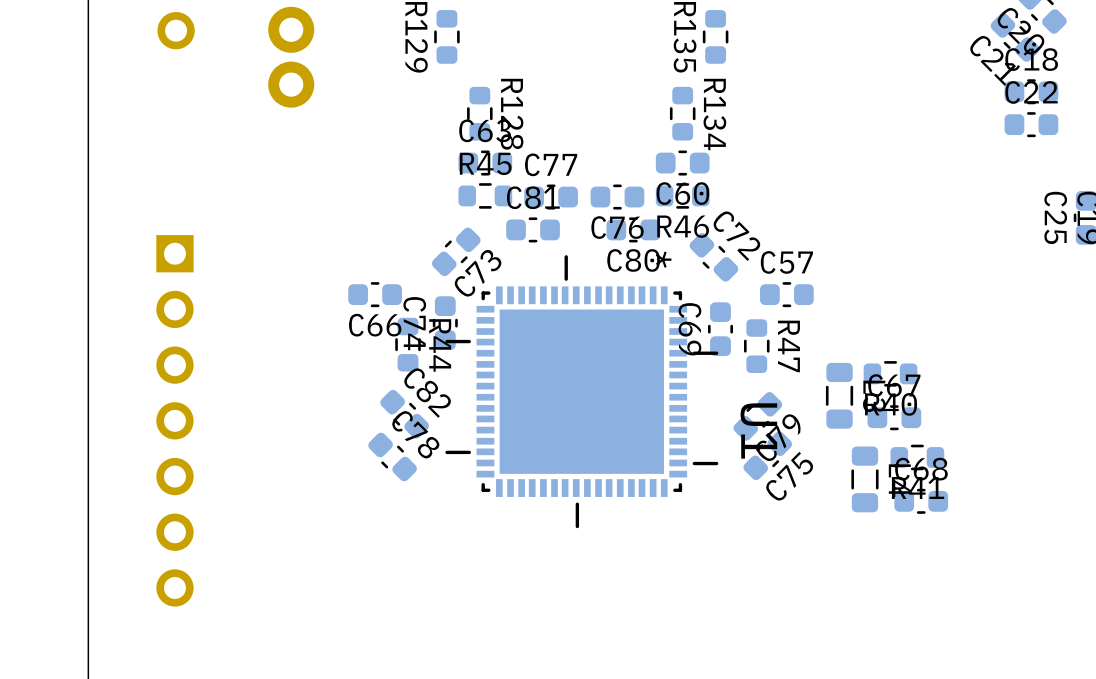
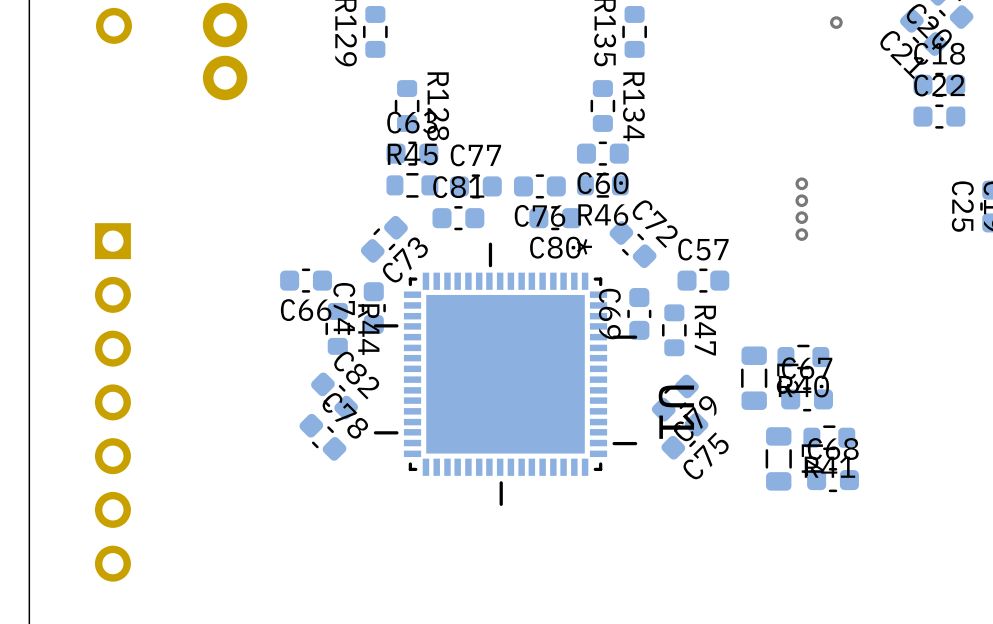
via: none -> (836, 22)
via: none -> (801, 183)
via: none -> (801, 200)
via: none -> (801, 217)
via: none -> (801, 234)

